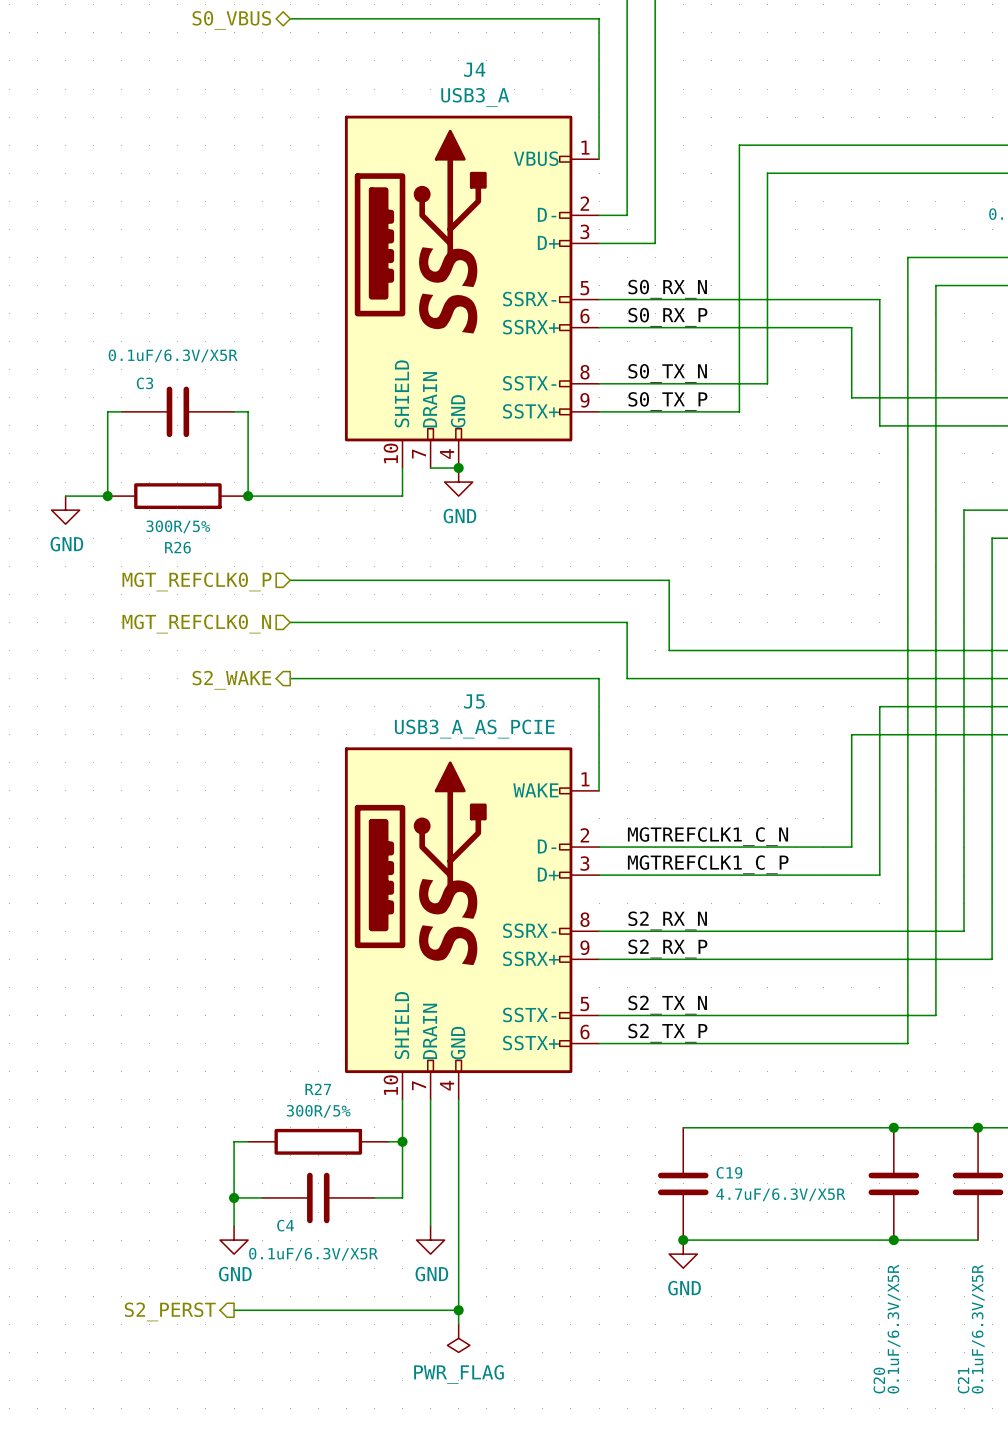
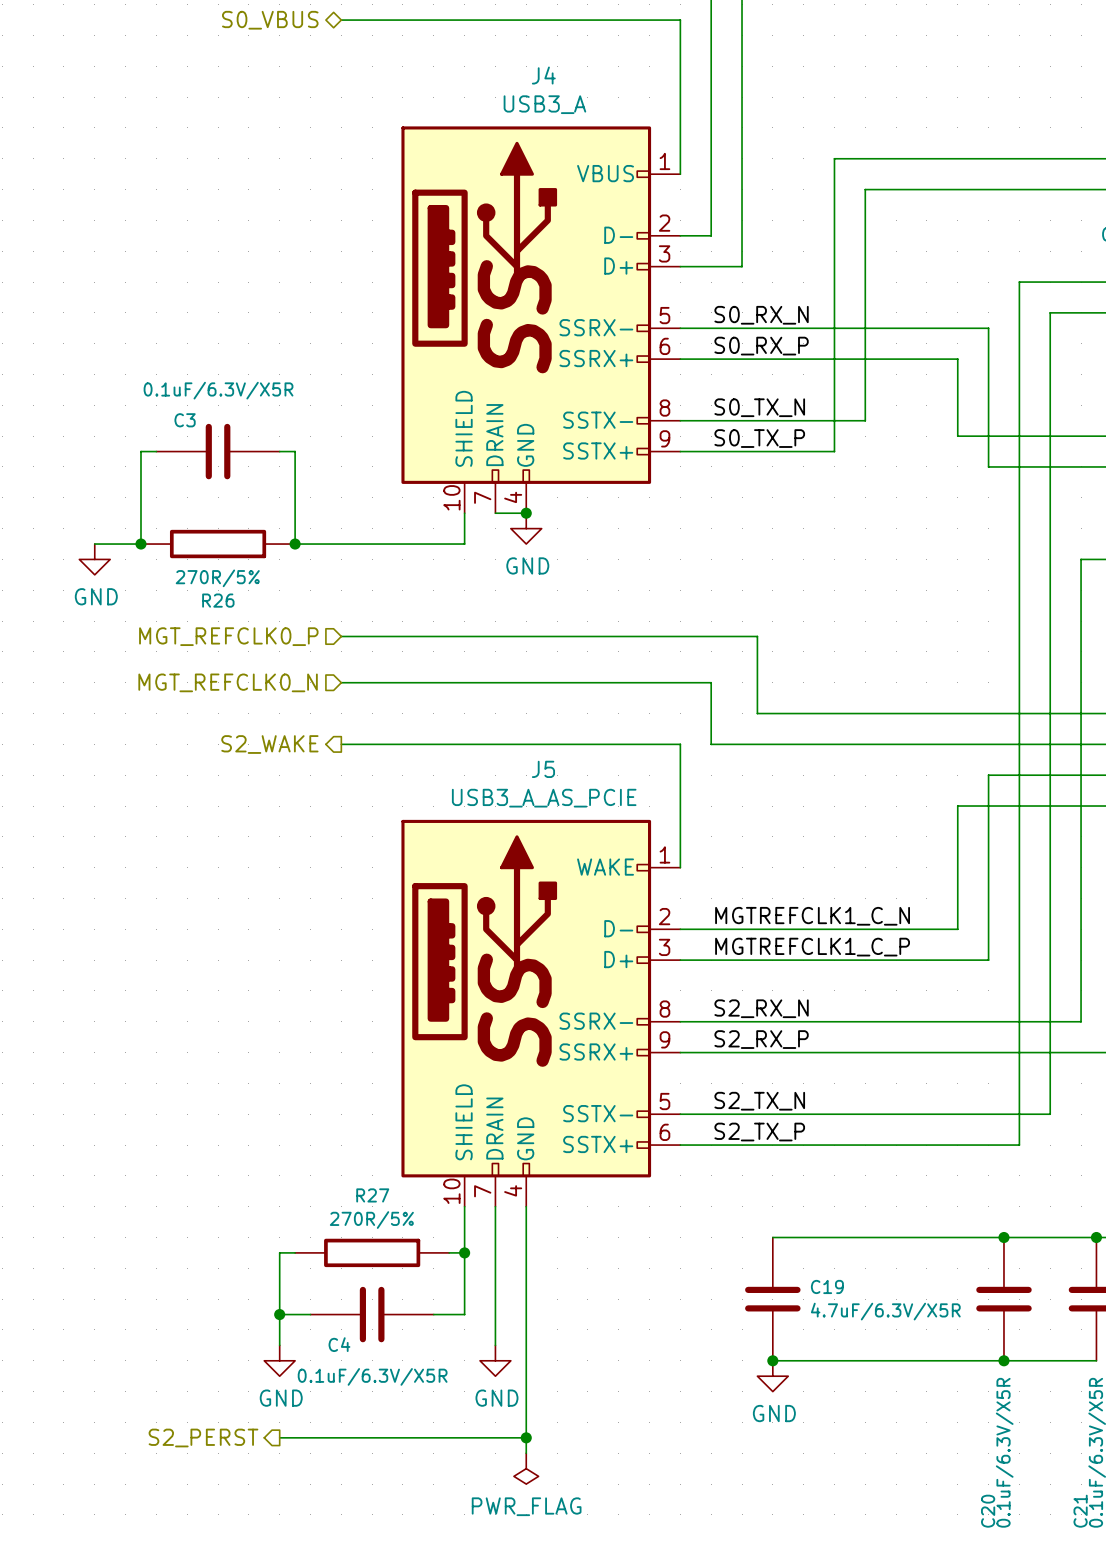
R26 value: 300R/5% (178, 526) -> 270R/5% (217, 578)
R27 value: 300R/5% (318, 1111) -> 270R/5% (371, 1220)

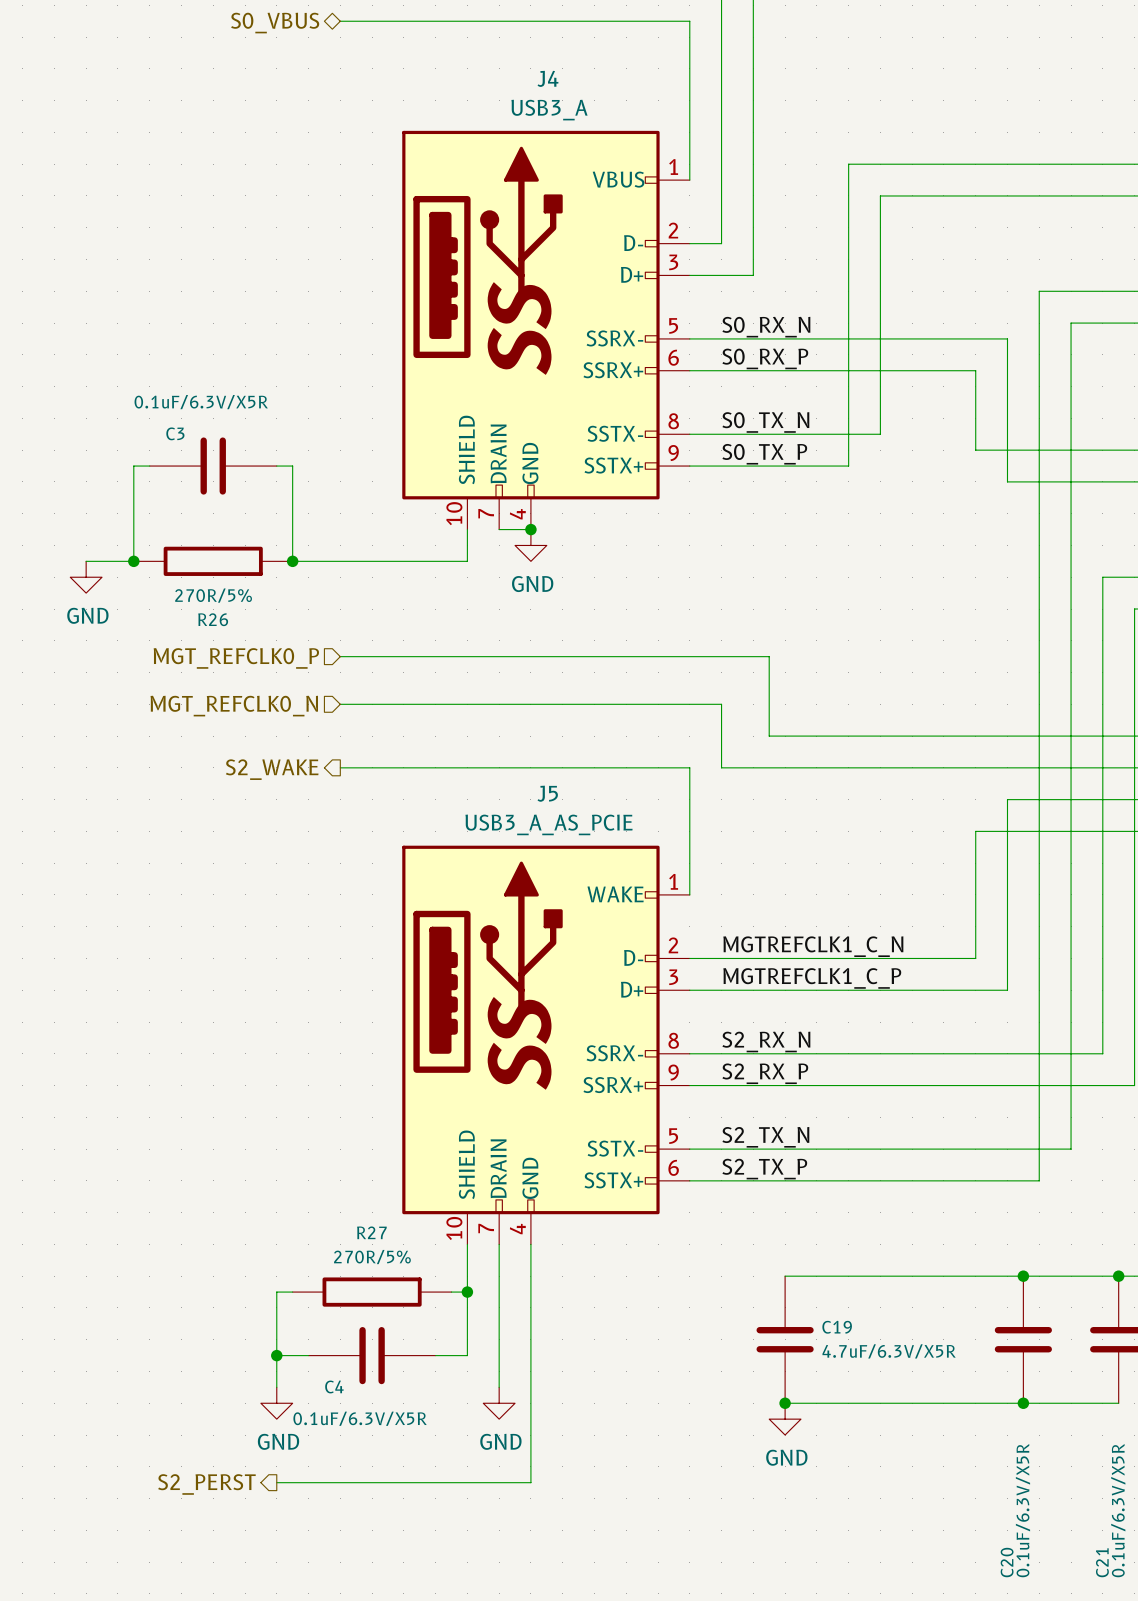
wire: (526, 1437) (526, 1453) -> none
junction: (526, 1437) -> none
power symbol: PWR_FLAG (526, 1468) -> none

